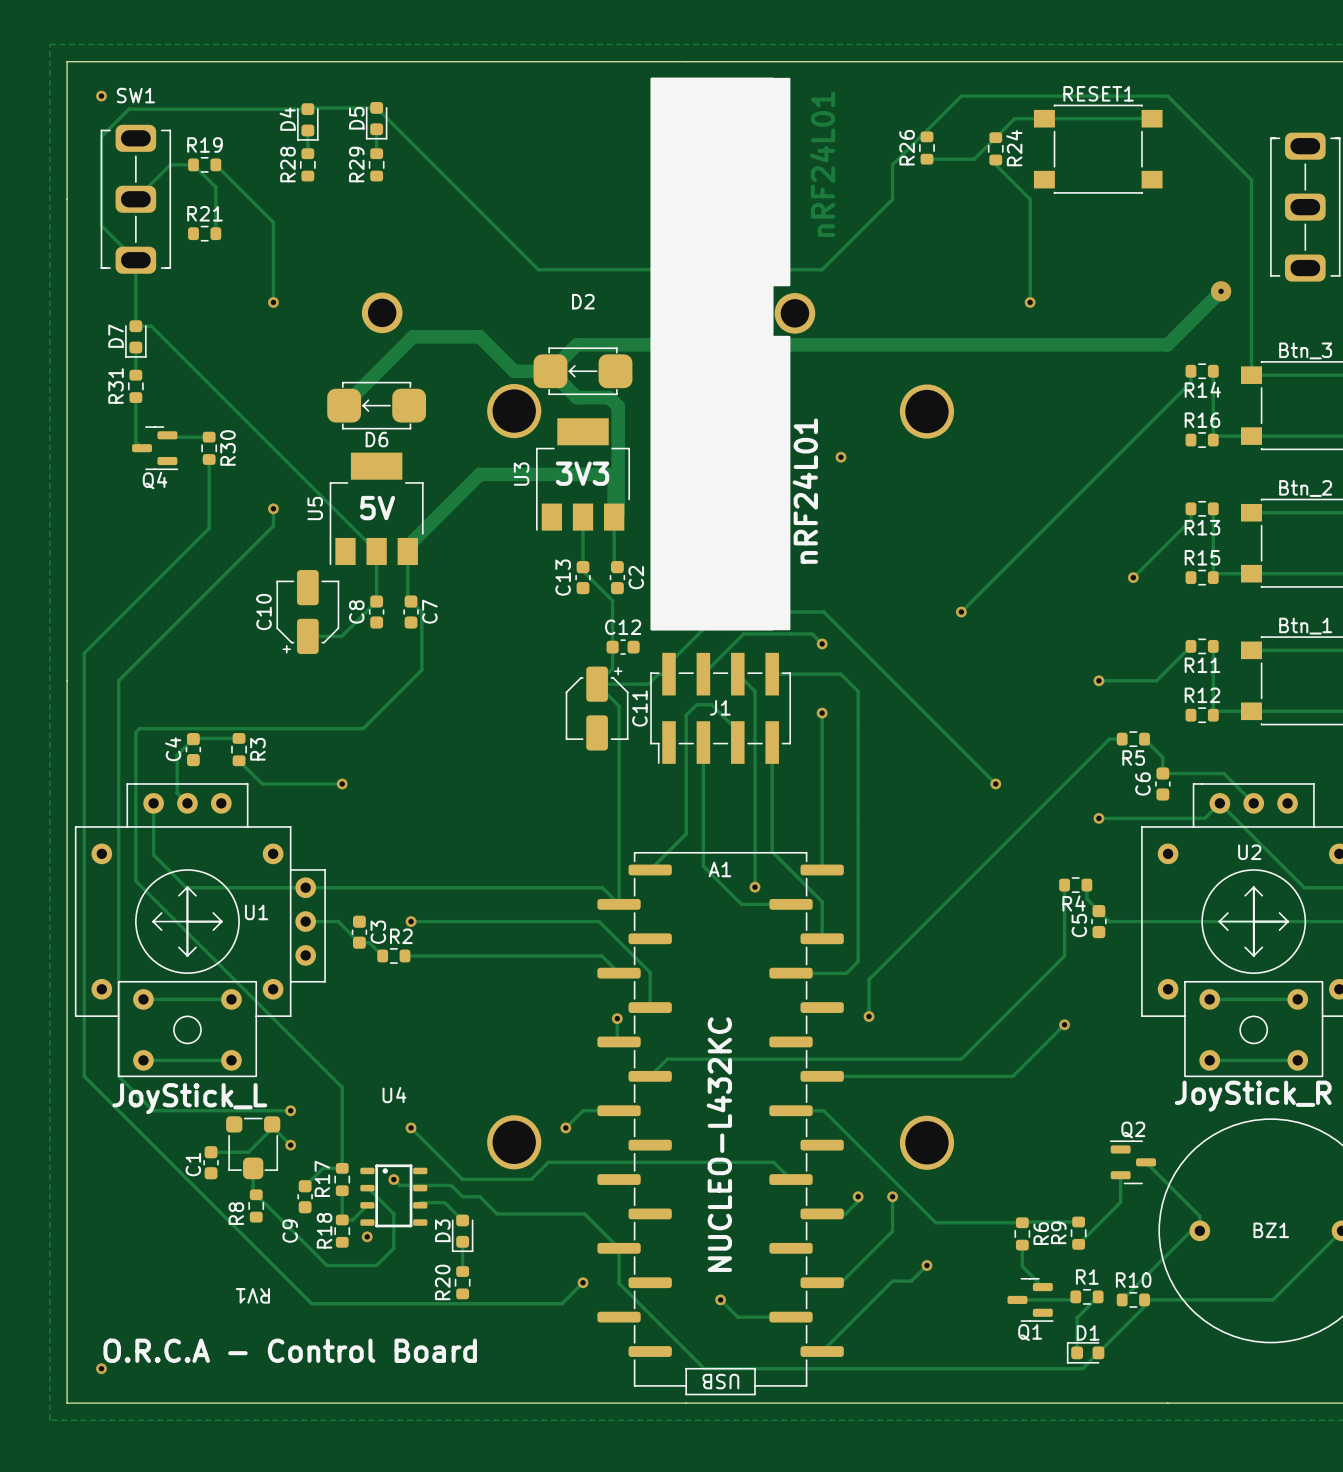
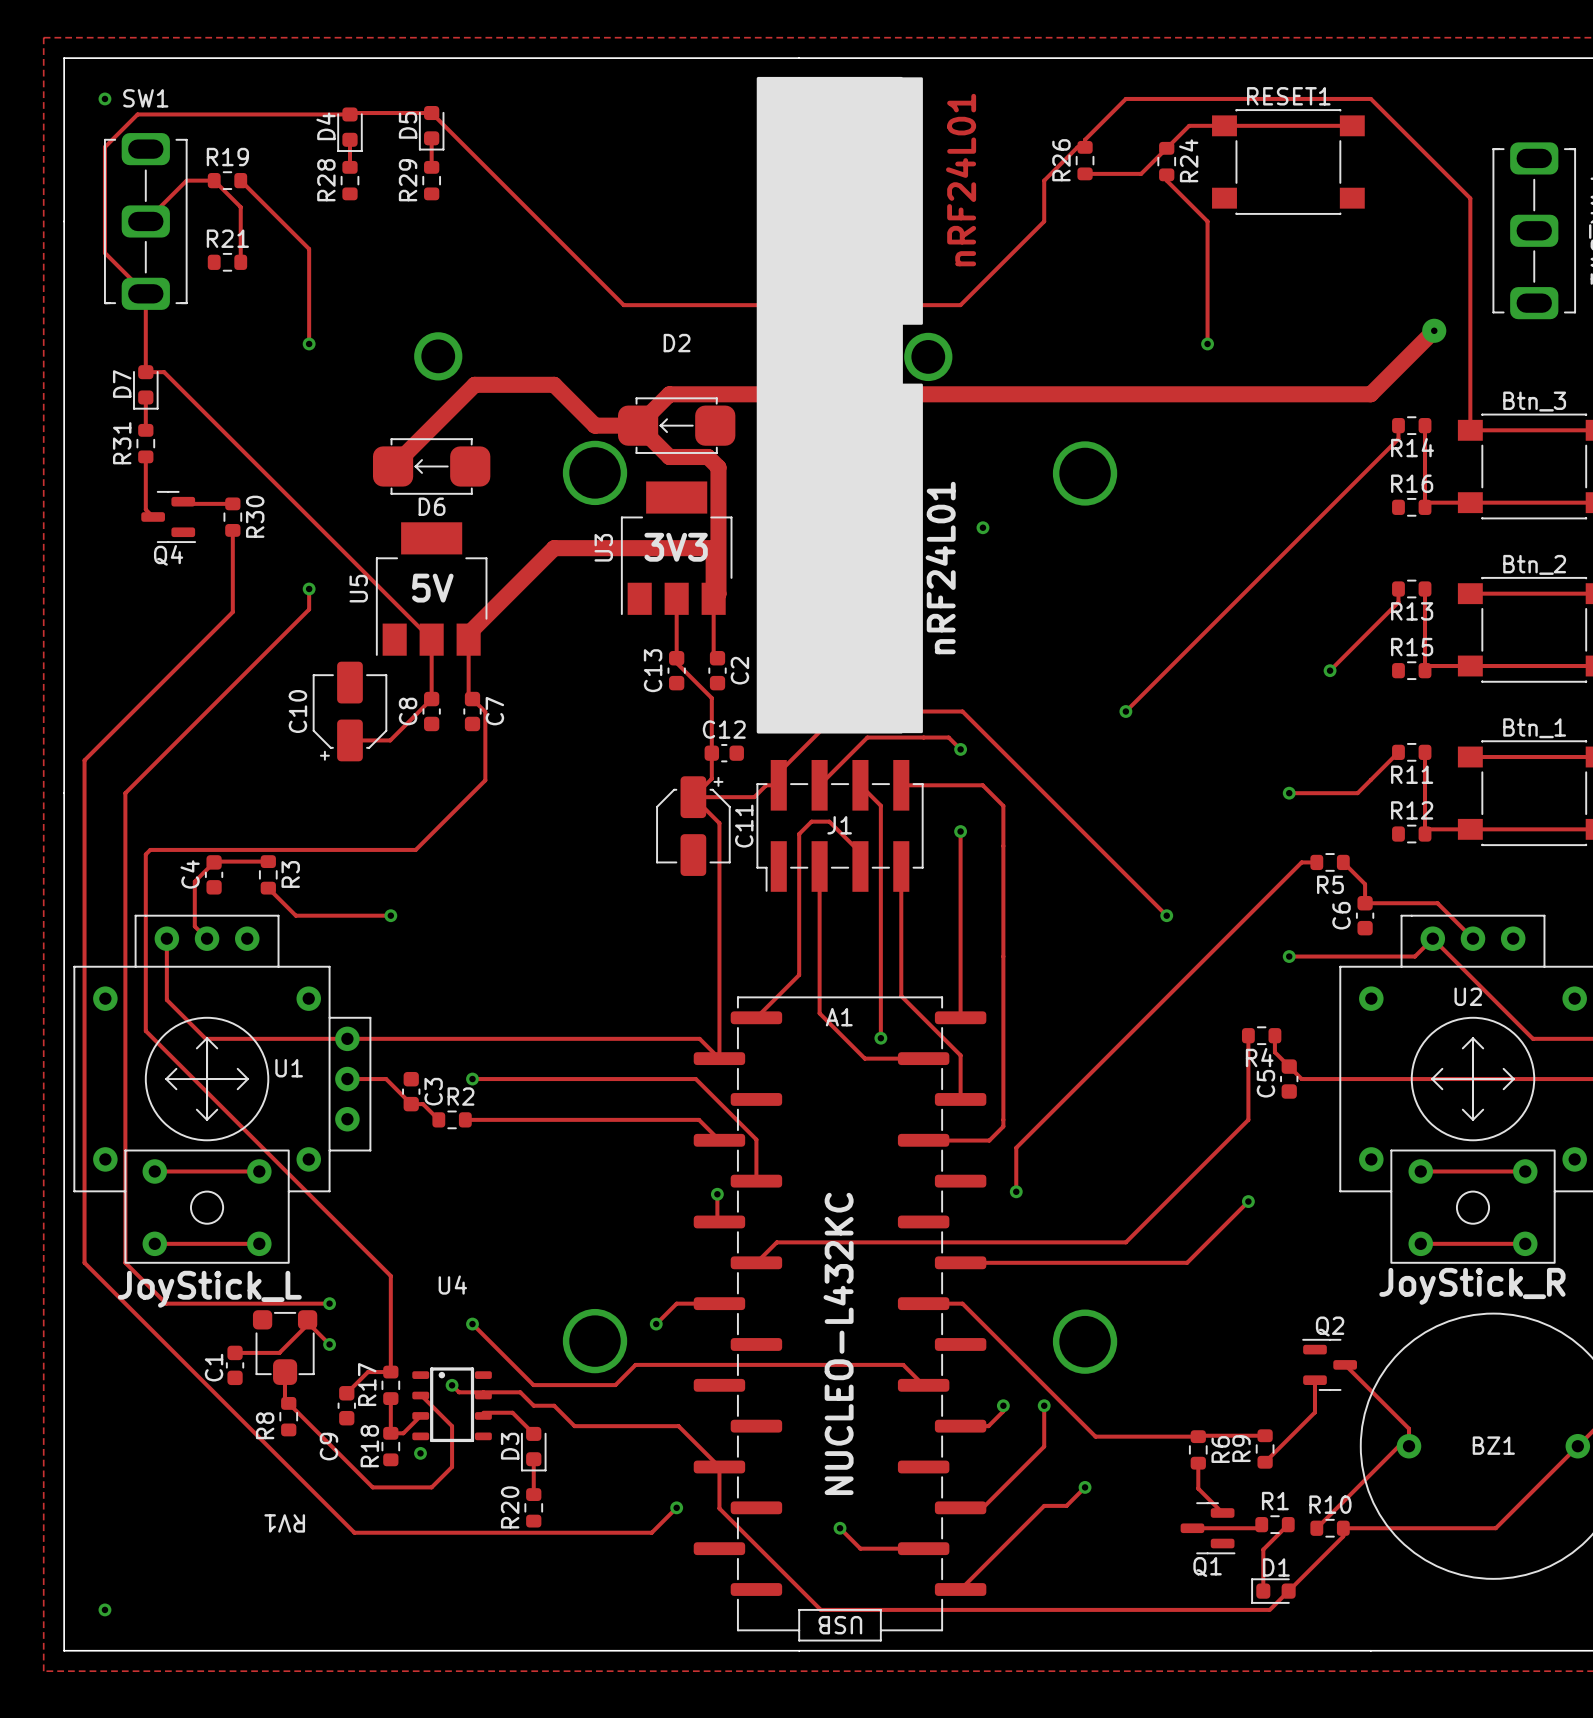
text: O.R.C.A - Control Board (290, 1350) -> none

